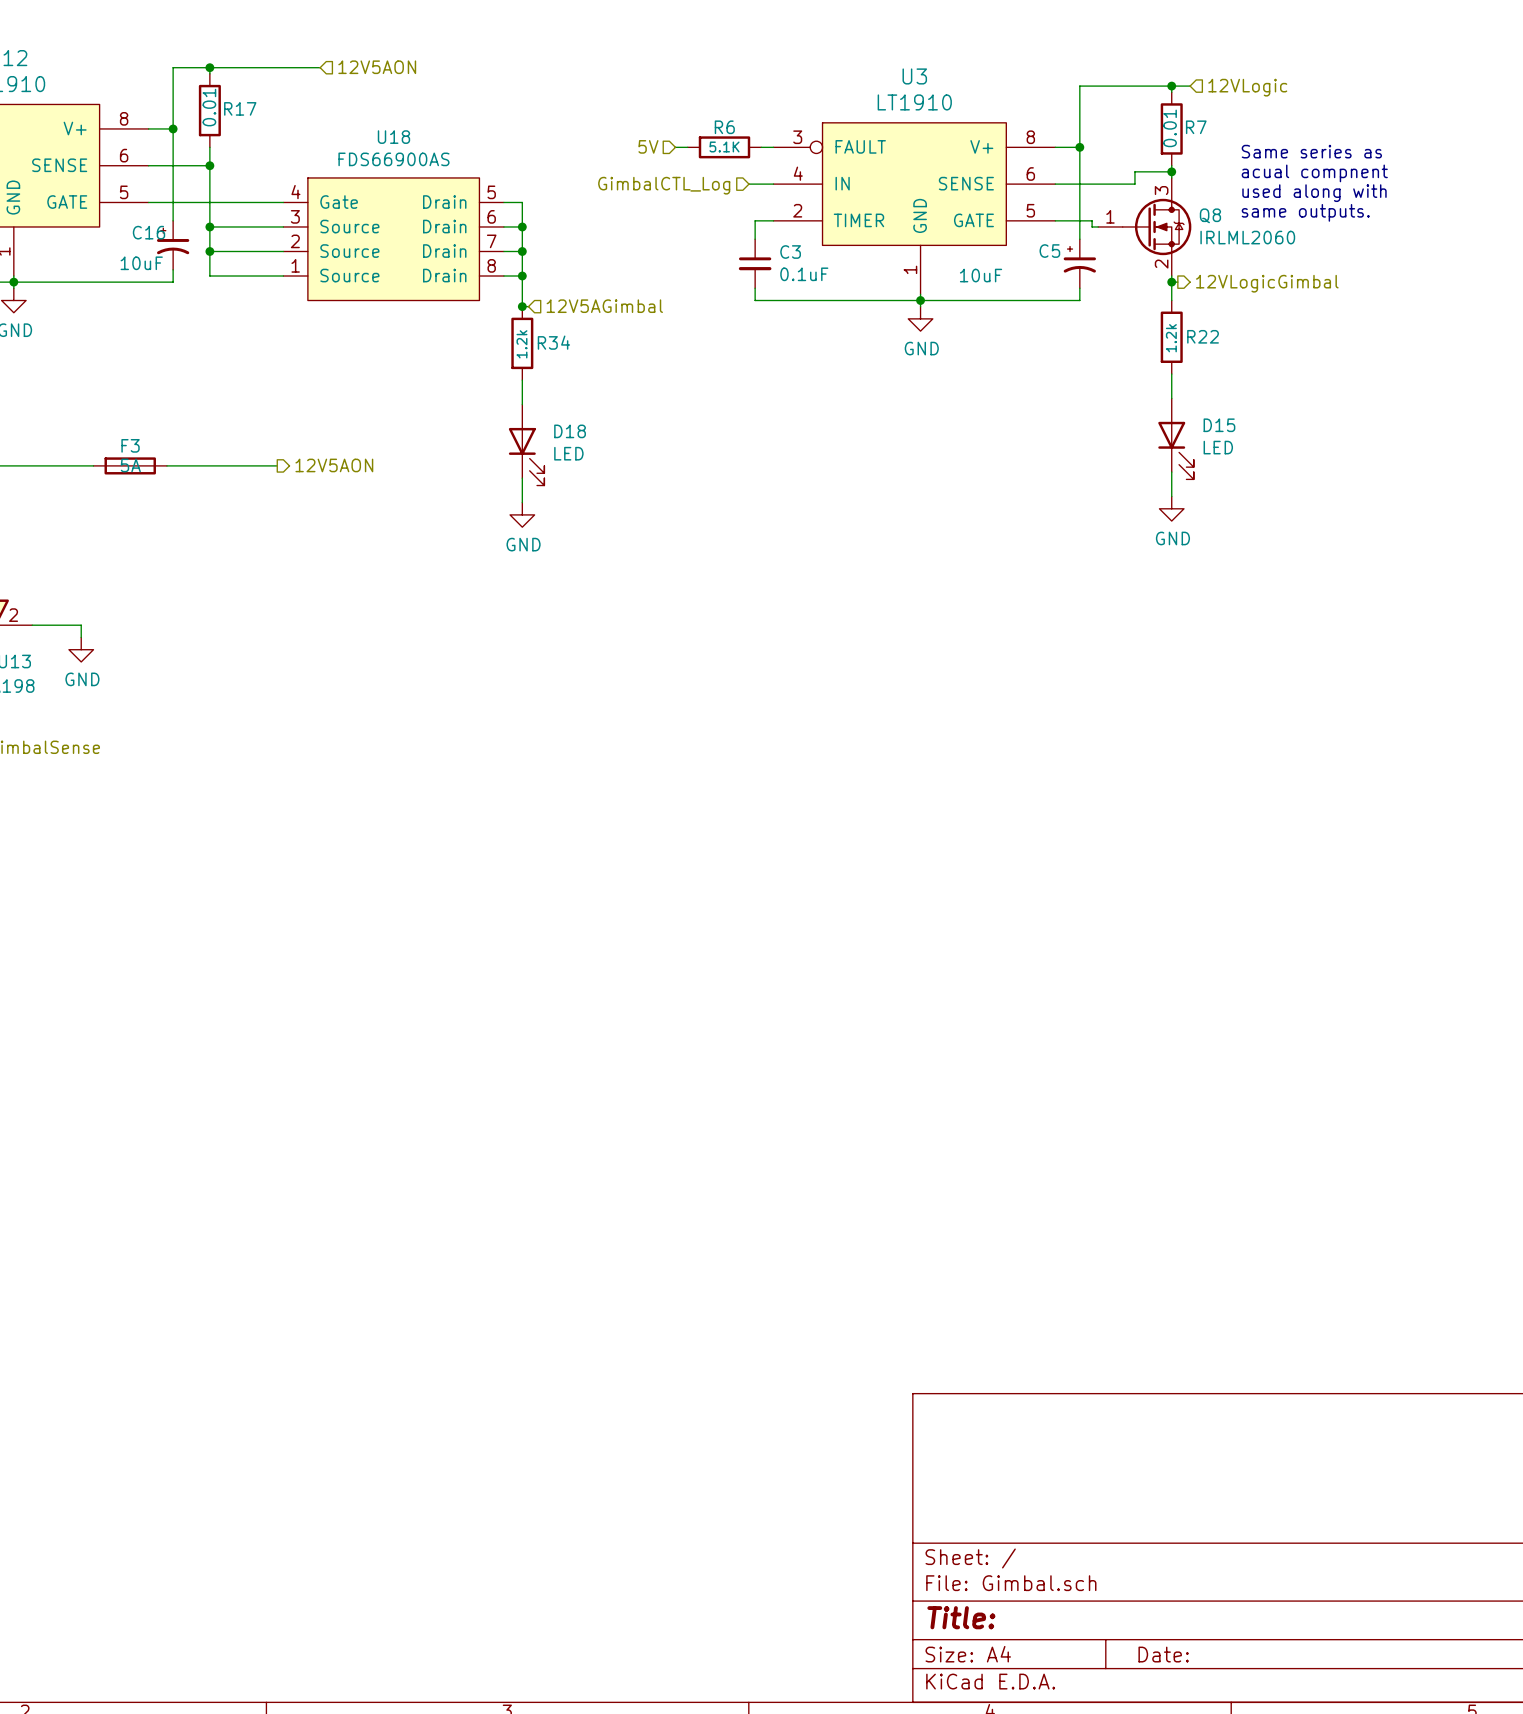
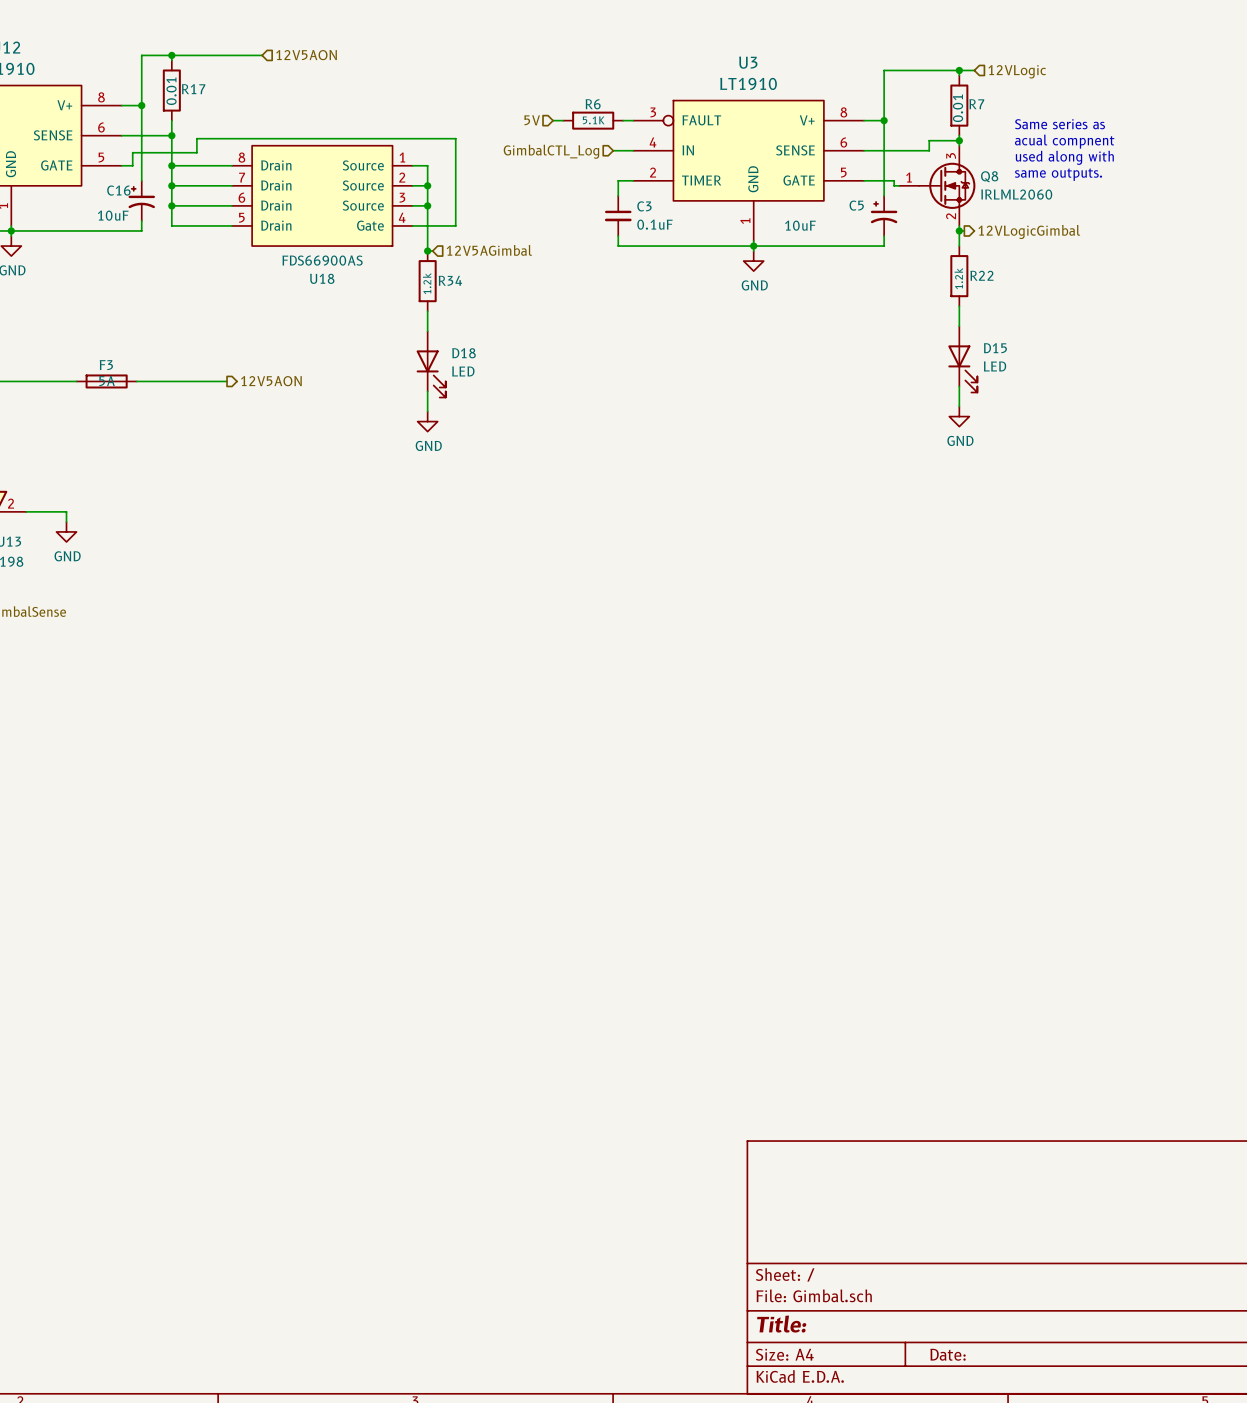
wire: (162, 202) (209, 202) -> (132, 165) (132, 152) (196, 152) (196, 138) (455, 138) (455, 225) (427, 225)
junction: none -> (171, 165)
U18 rotation: 0° (393, 239) -> 180° (322, 195)
junction: (522, 276) -> none

